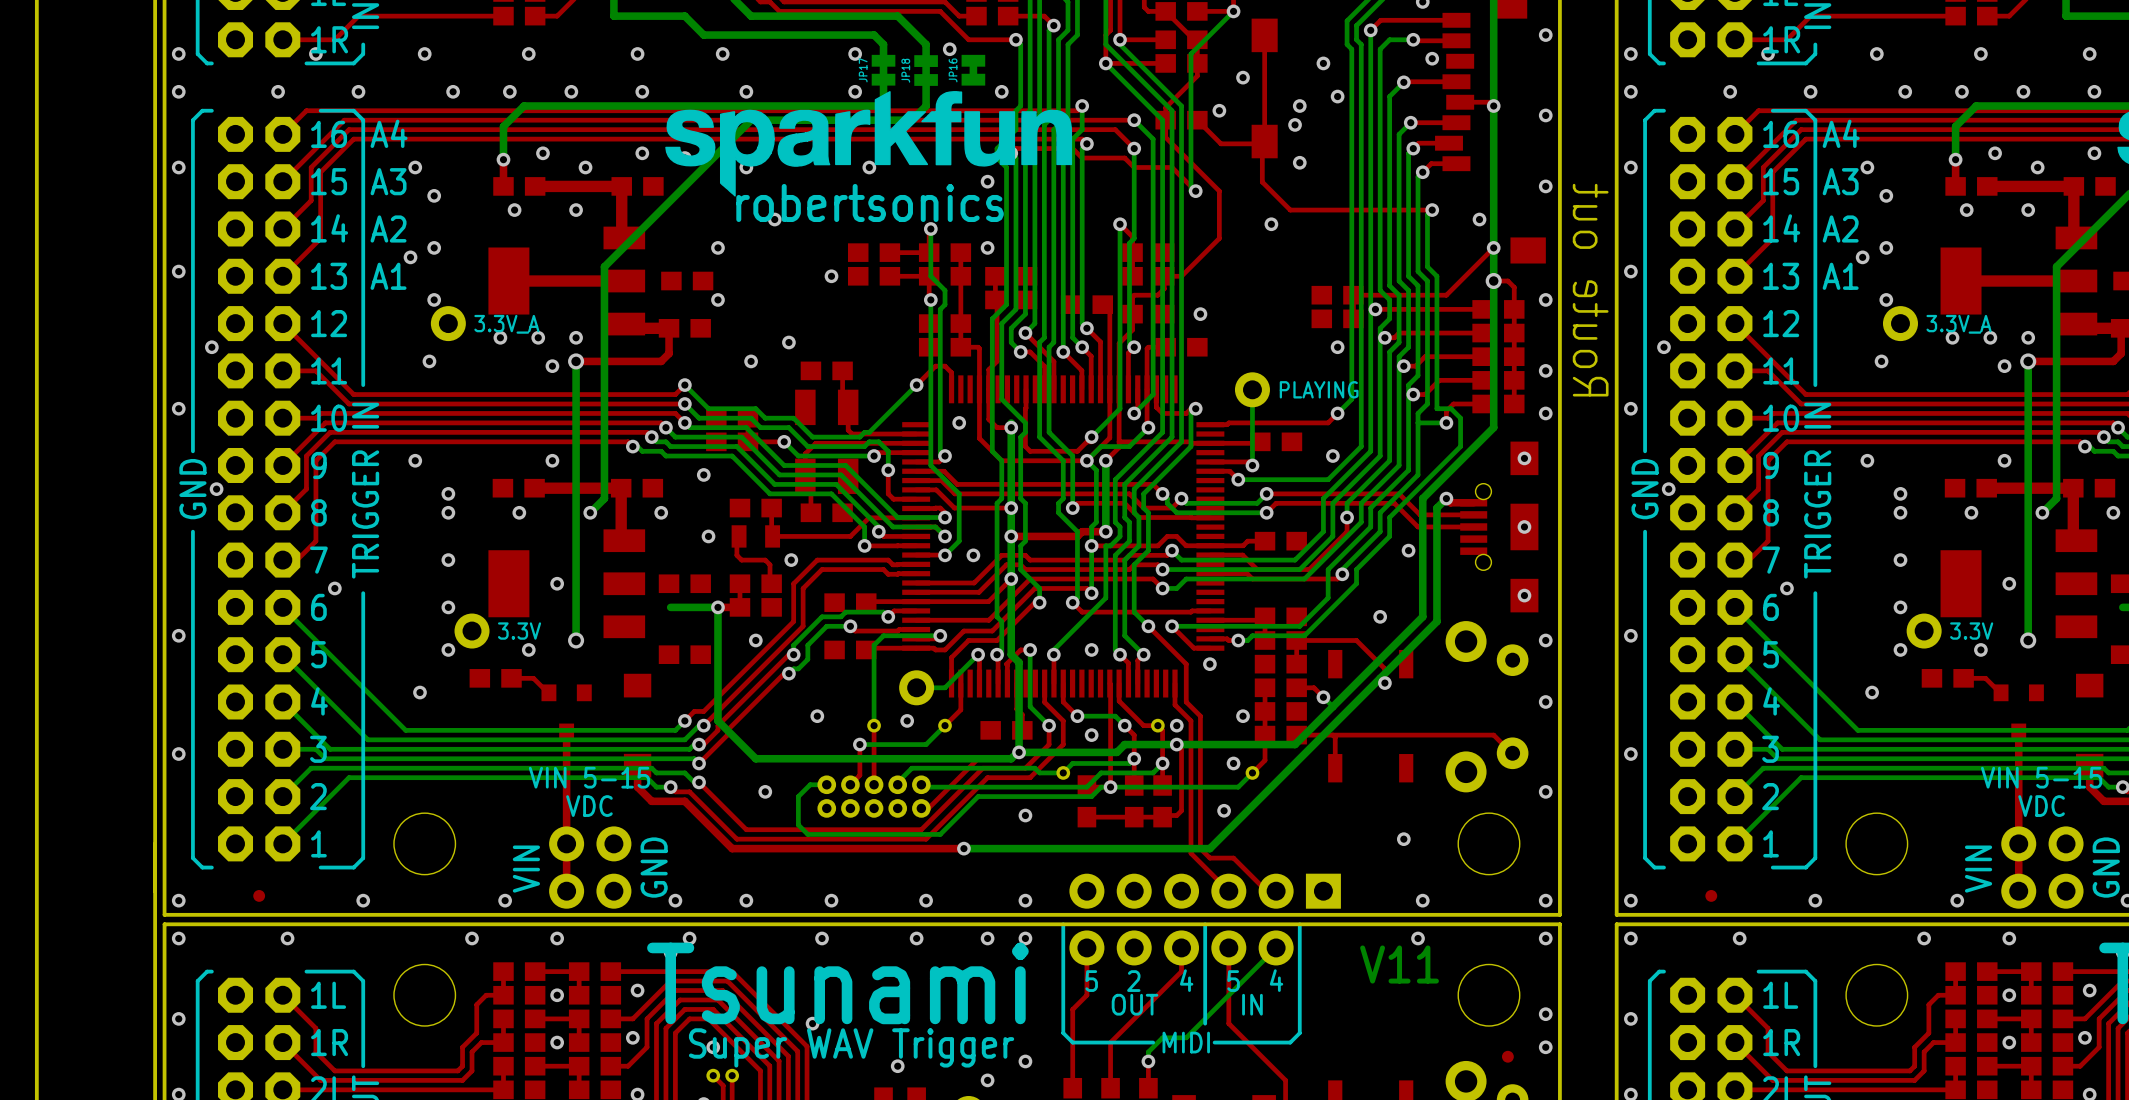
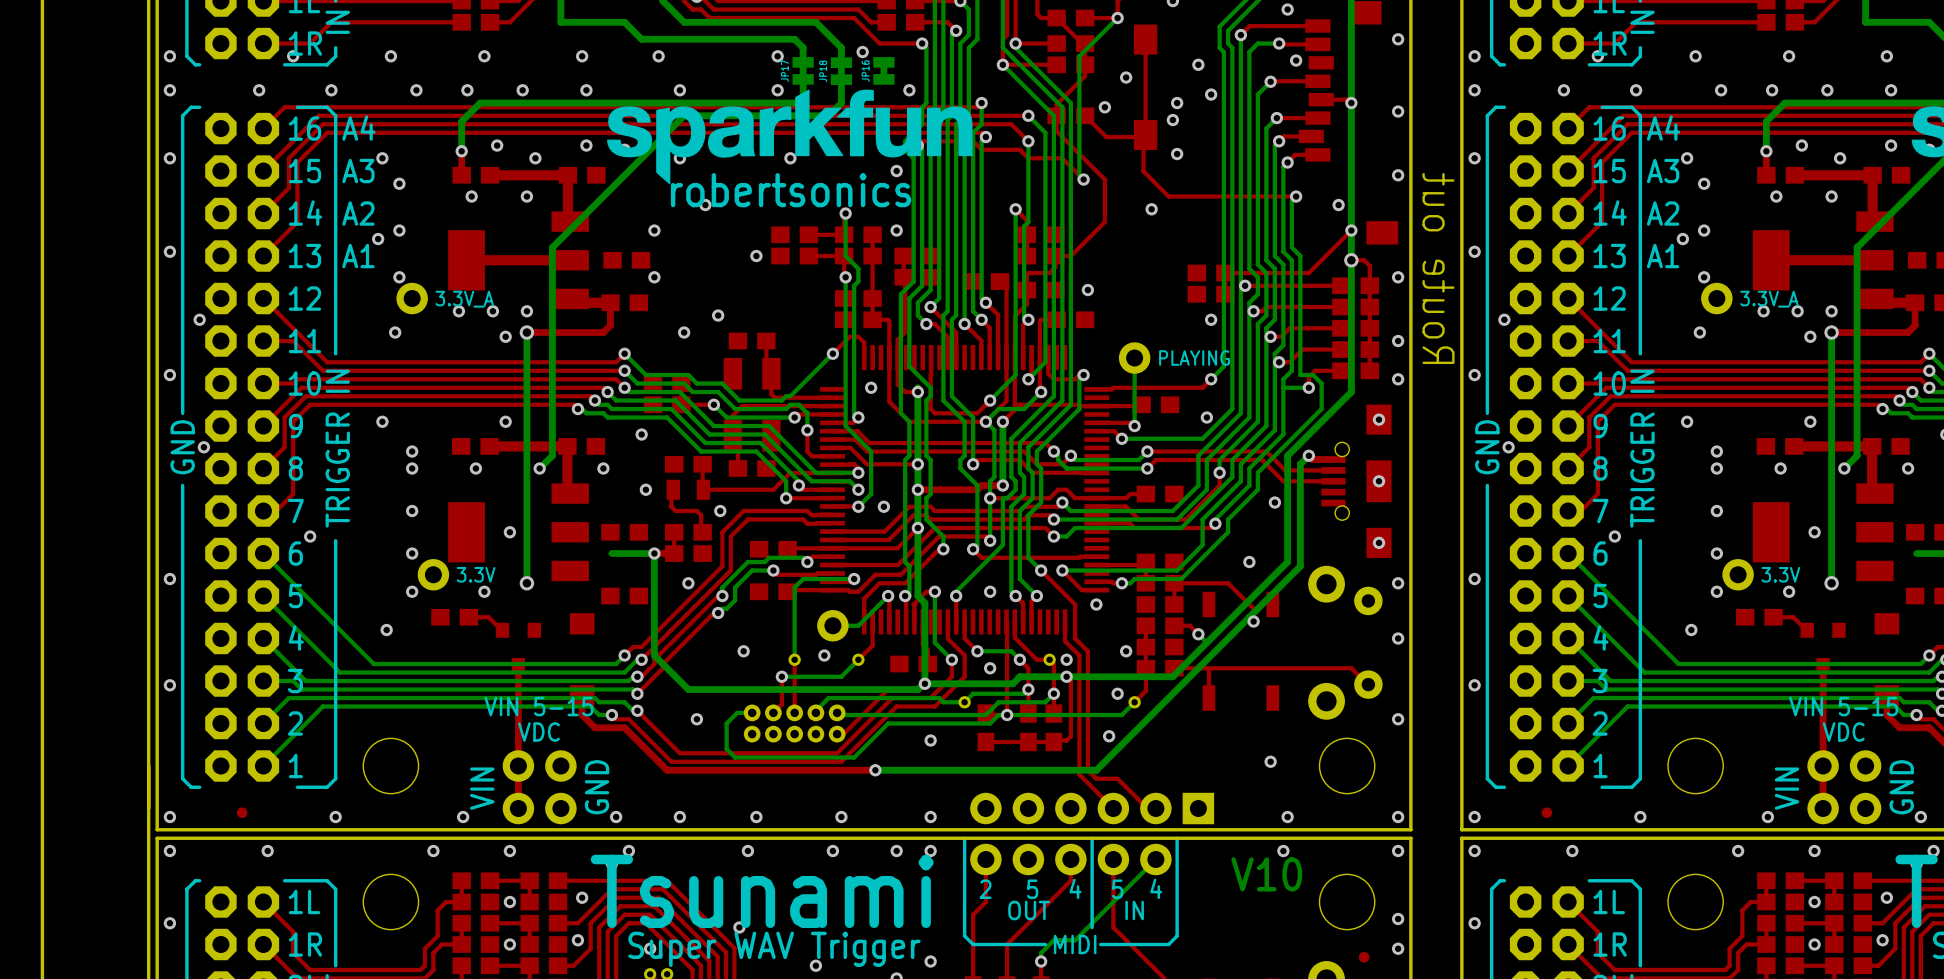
text: V11 (1399, 964) -> V10 (1266, 874)
text: 5 (1091, 981) -> 2 (985, 889)
text: 2 (1133, 981) -> 5 (1032, 889)

